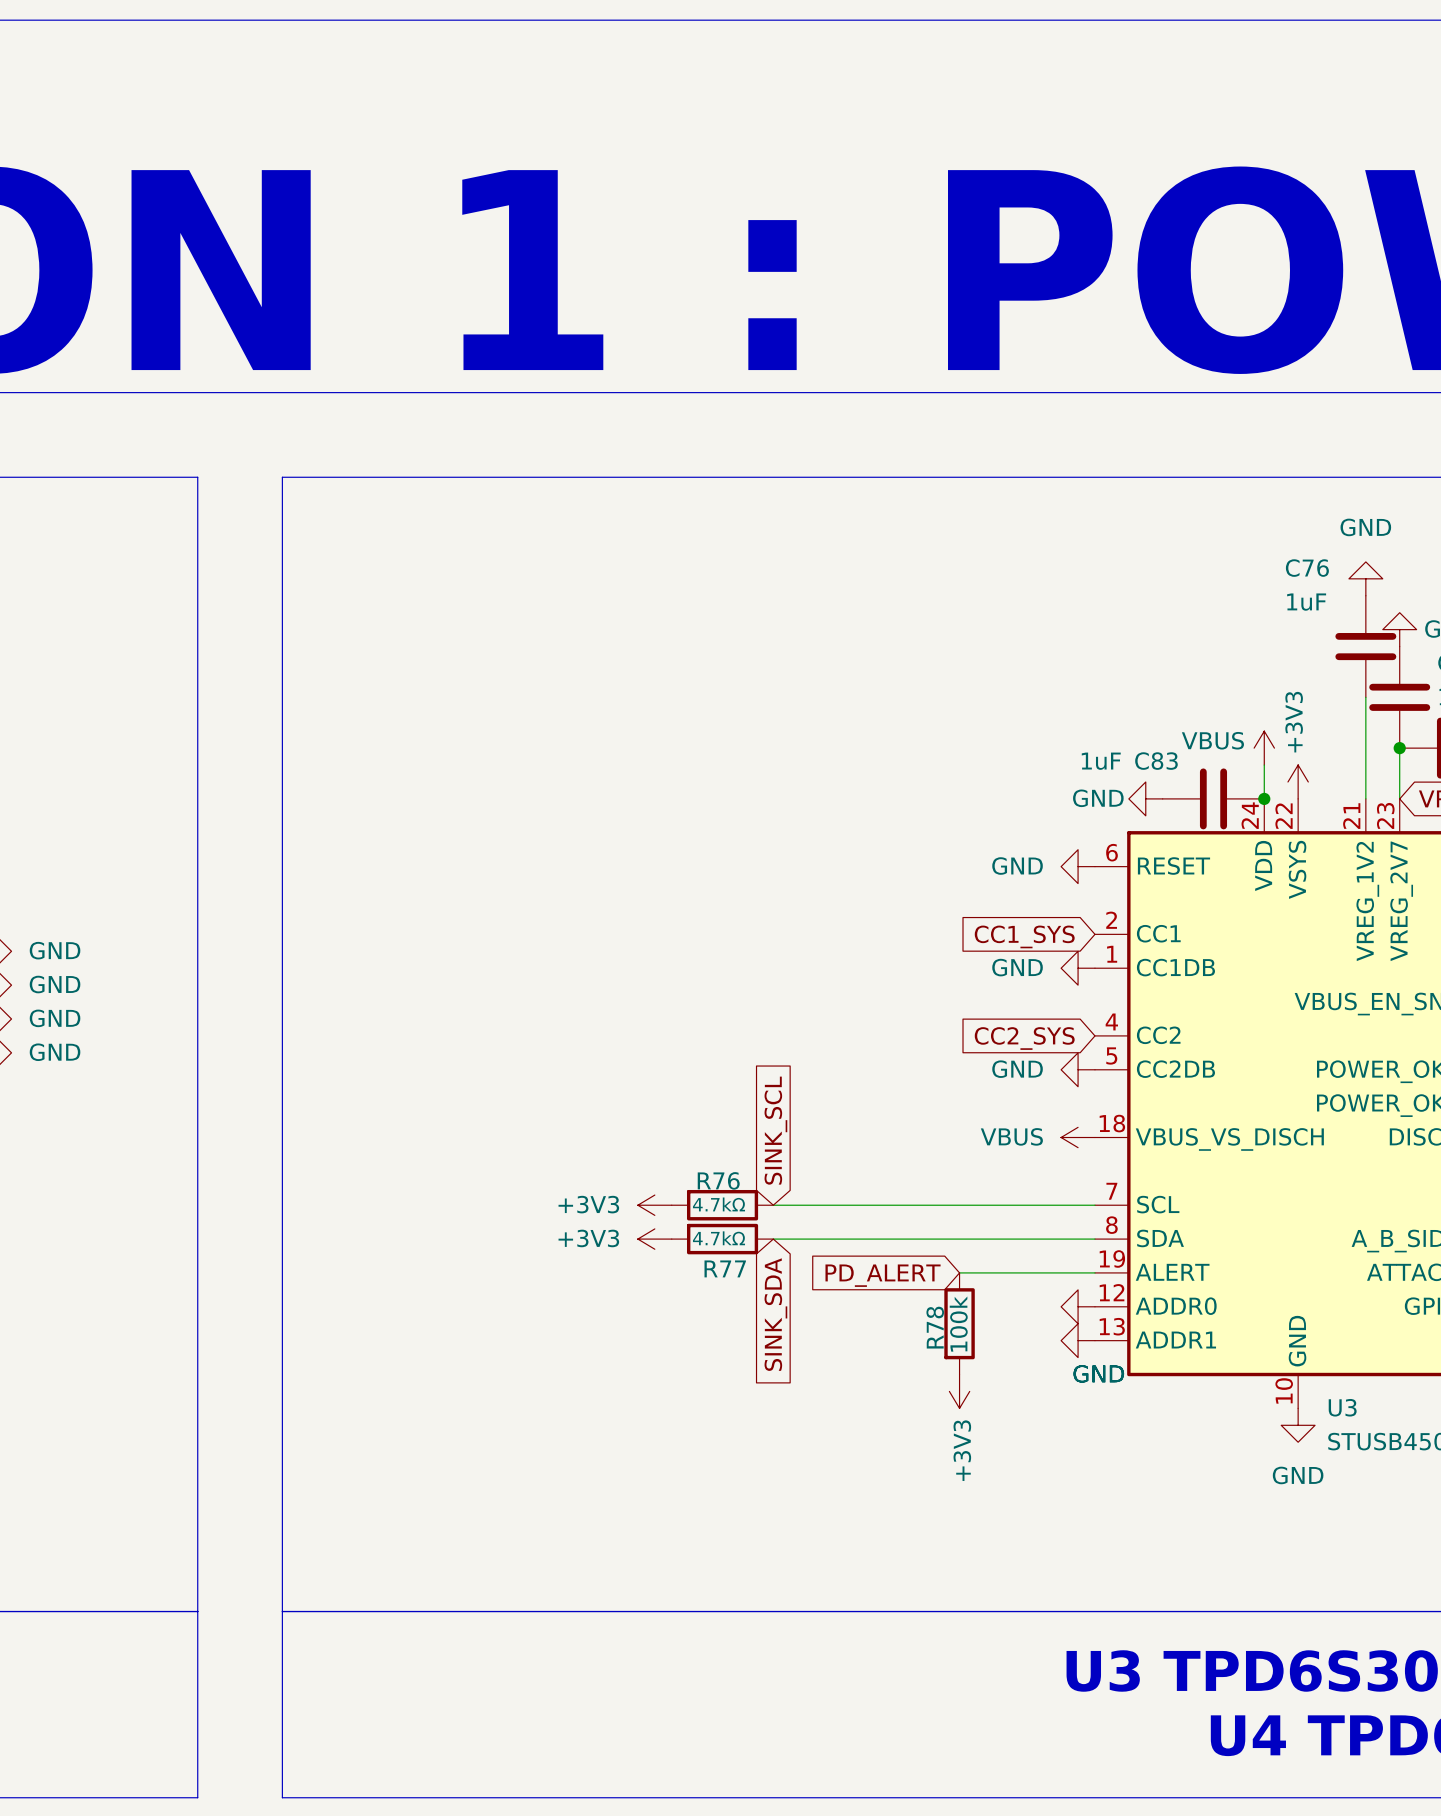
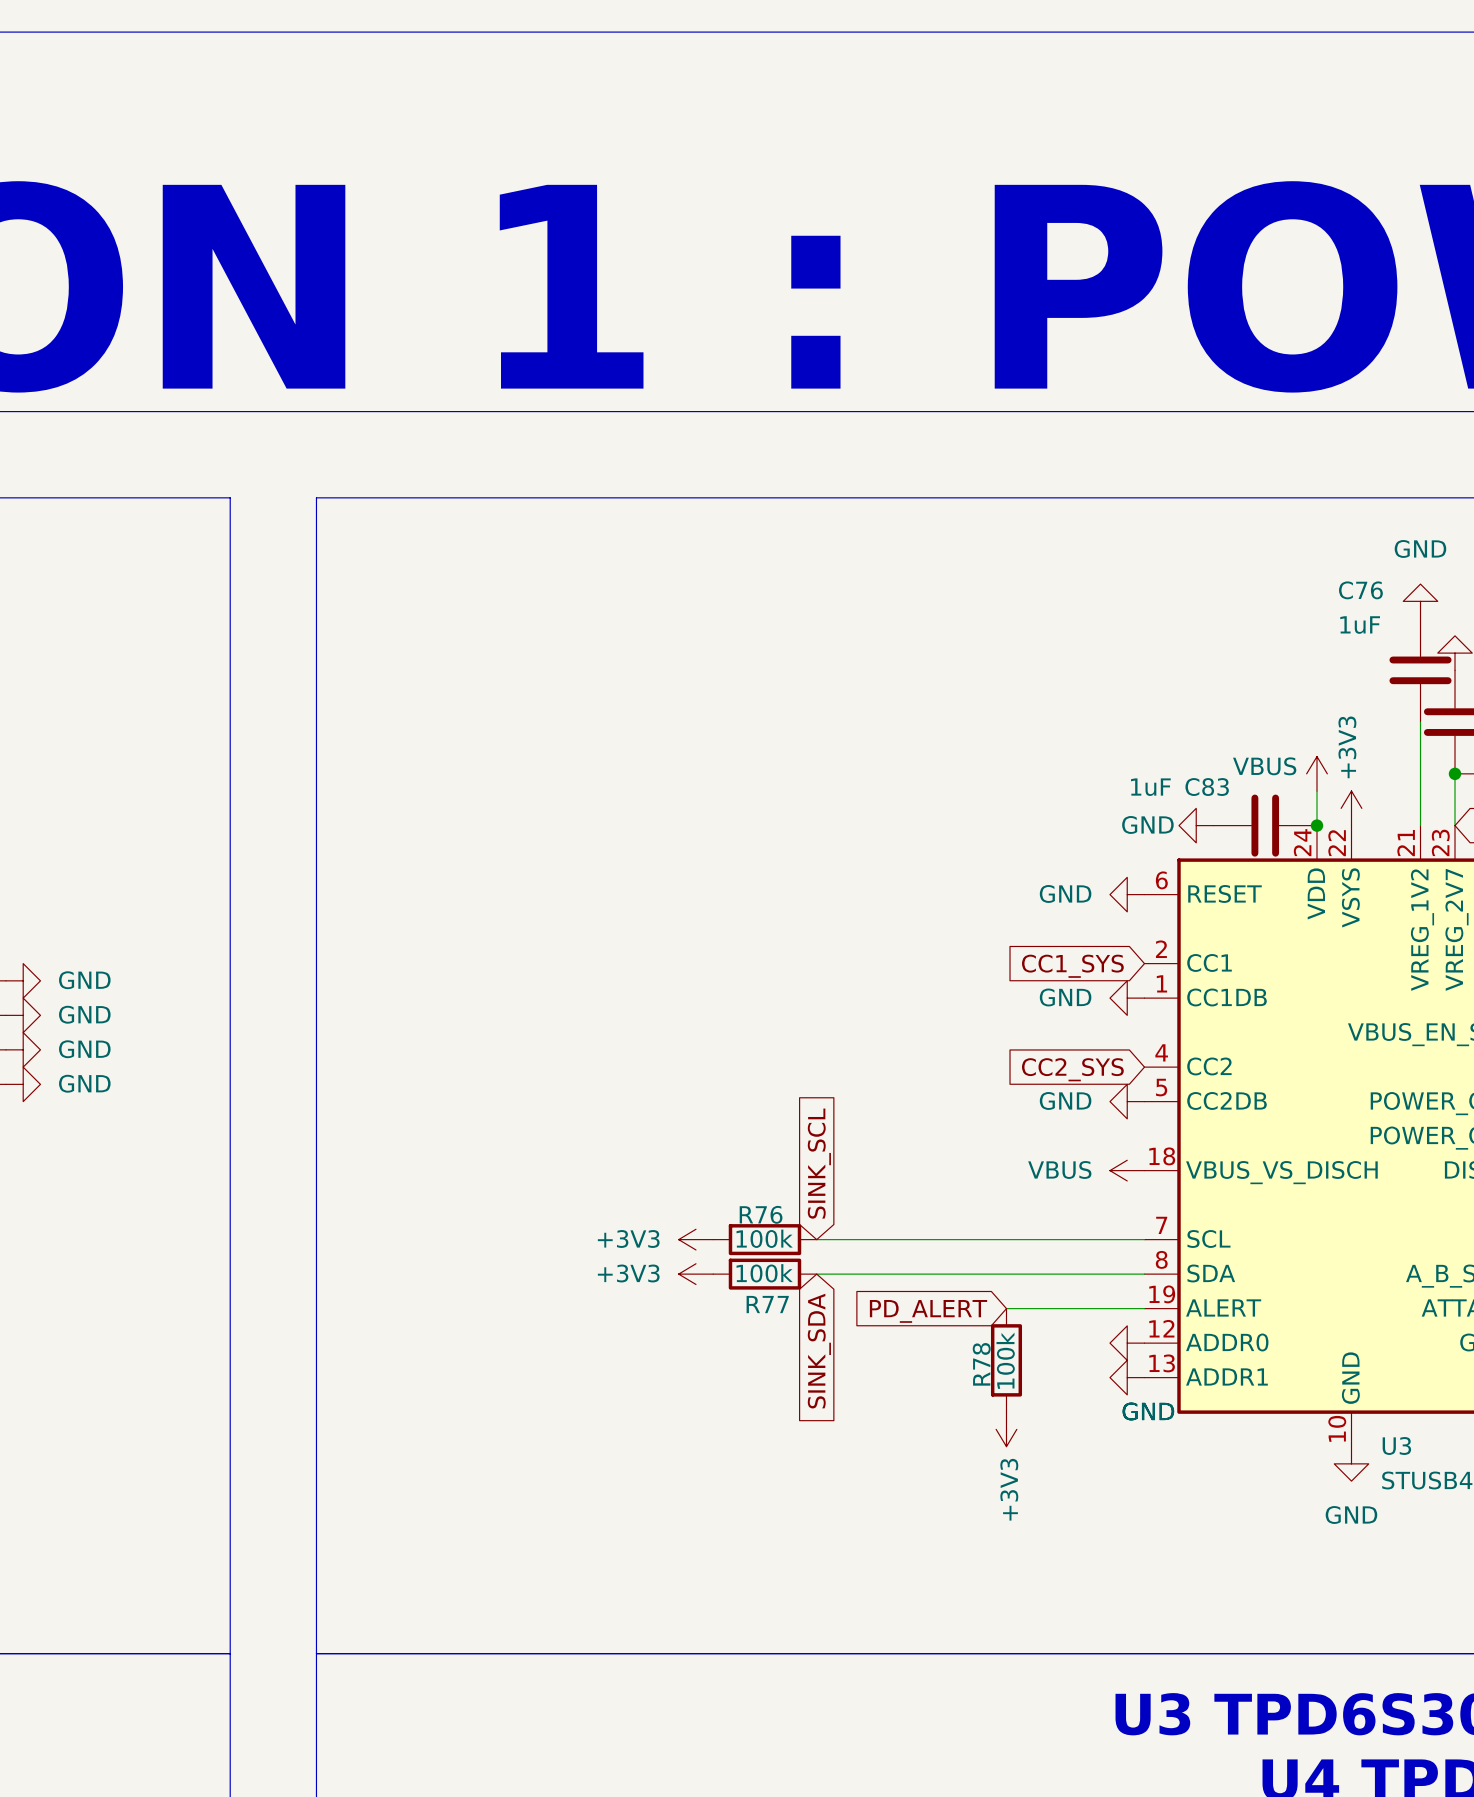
R76 value: 4.7kΩ (718, 1204) -> 100k (764, 1238)
R77 value: 4.7kΩ (718, 1238) -> 100k (764, 1273)

